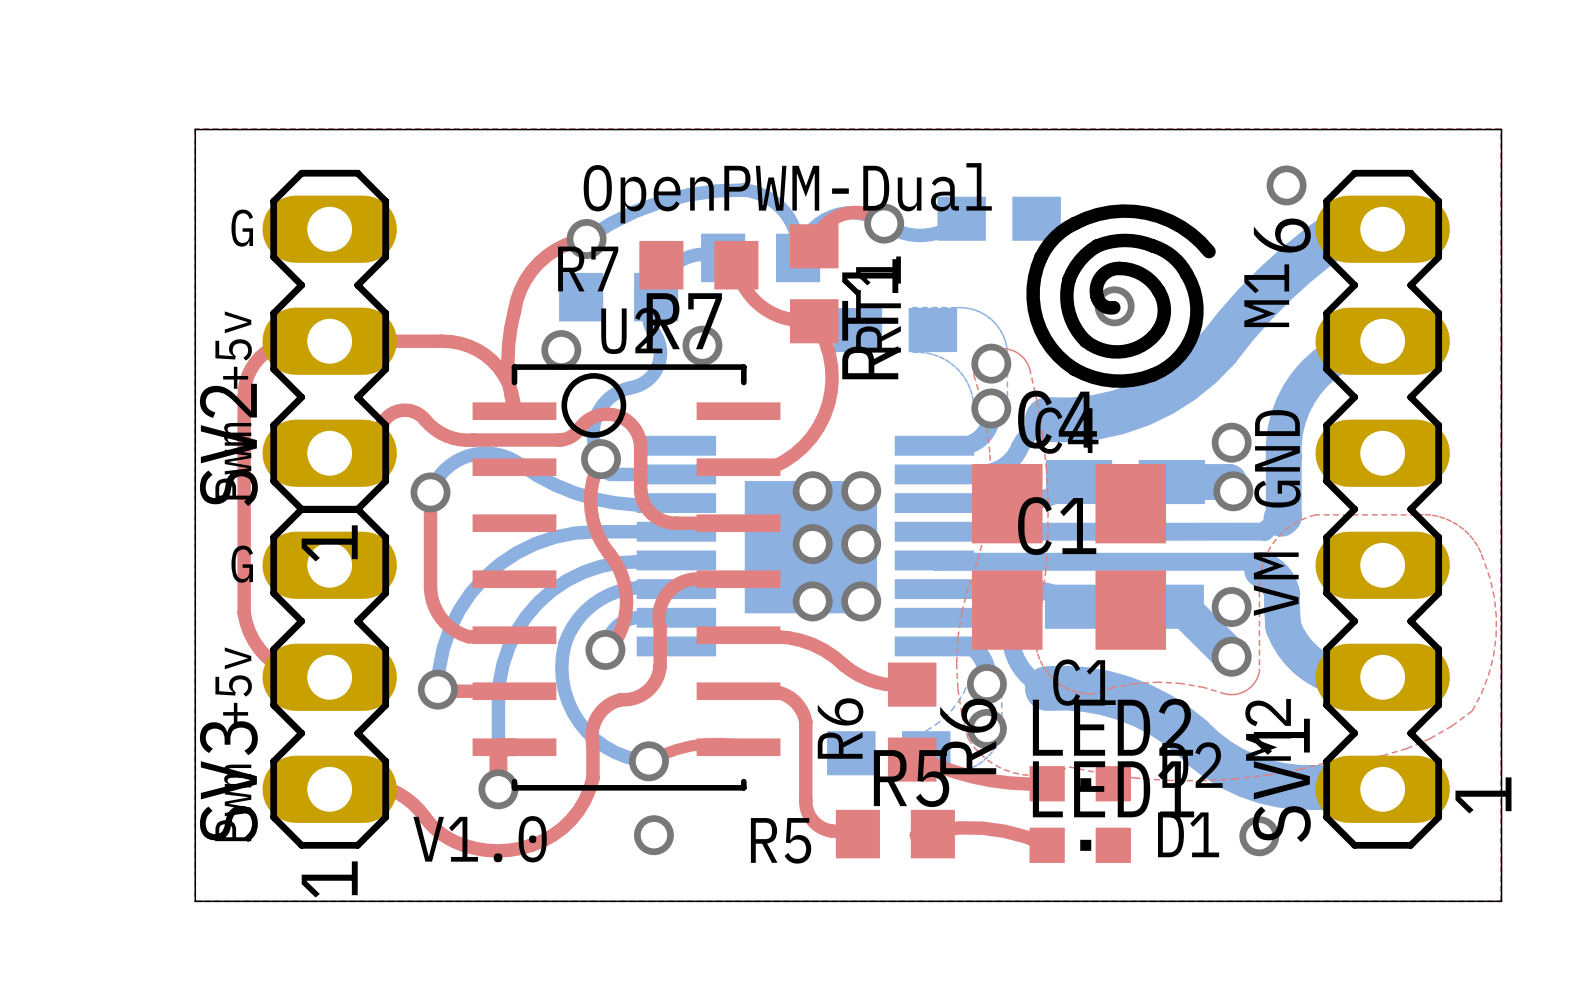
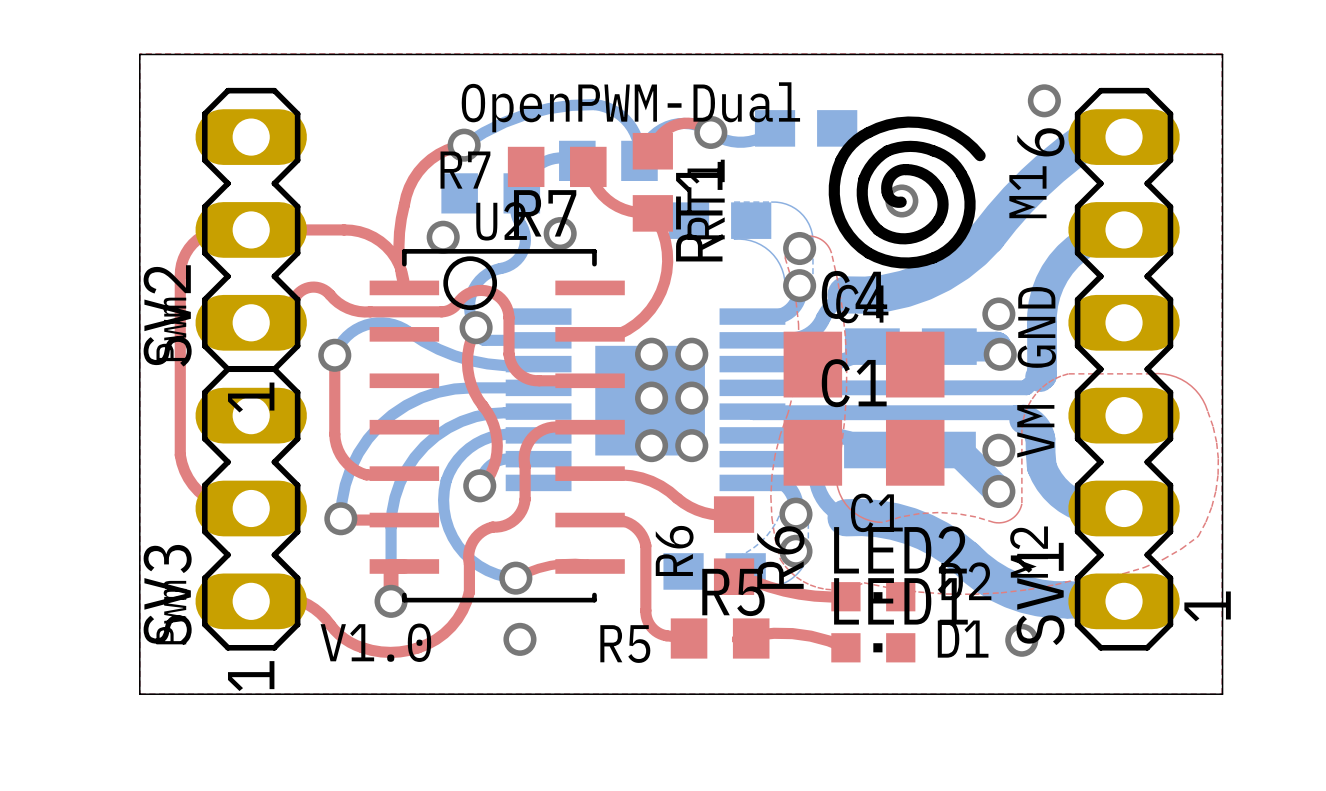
text: G (242, 228) -> none
text: +5v (233, 350) -> none
text: G (242, 564) -> none
text: +5v (233, 686) -> none

